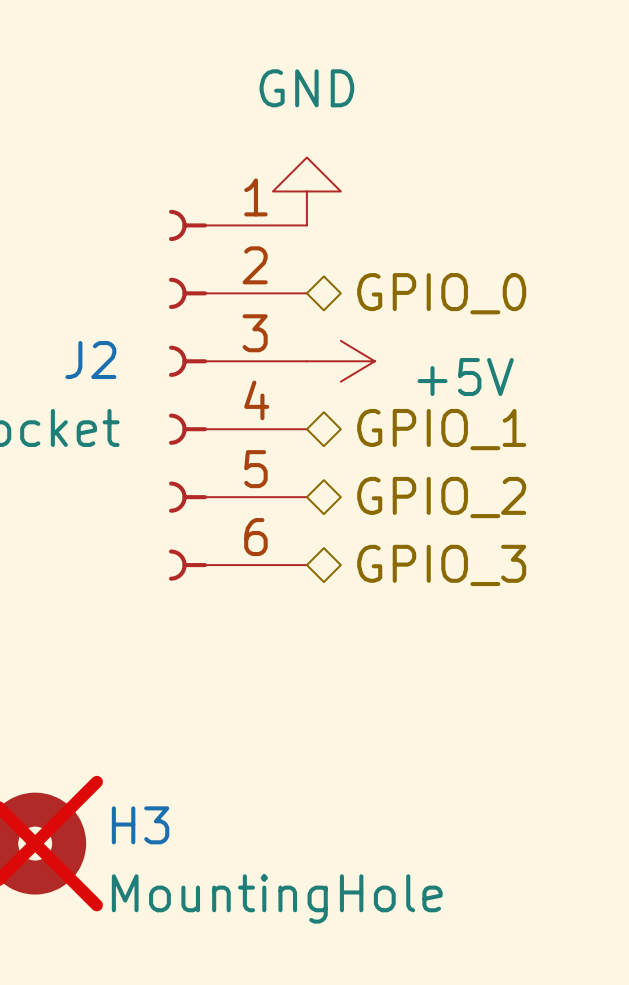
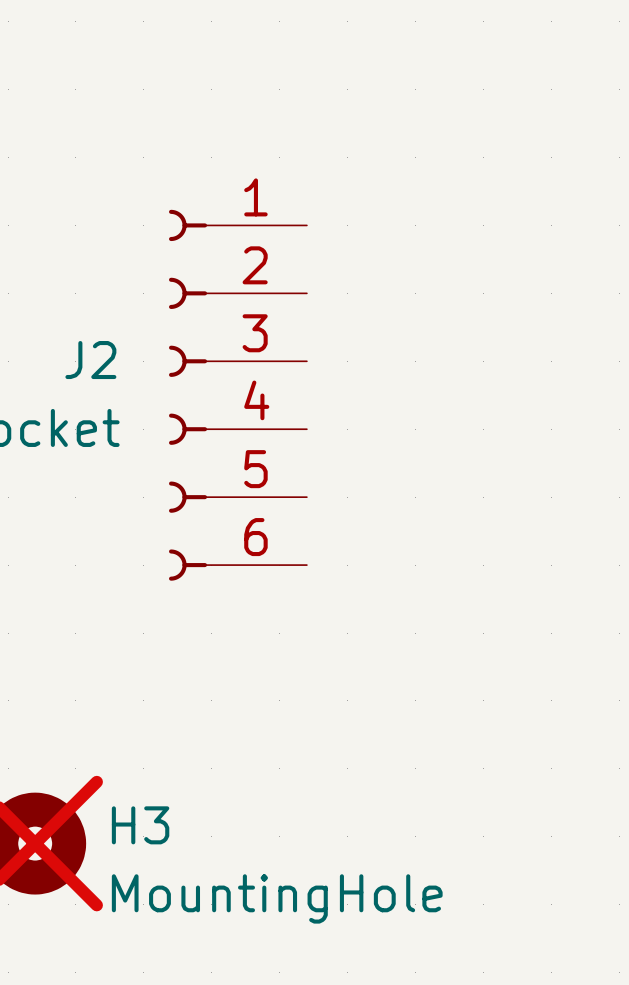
power symbol: GND (306, 191) -> none
hierarchical label: GPIO_0 (441, 293) -> none
power symbol: +5V (340, 361) -> none
hierarchical label: GPIO_1 (441, 429) -> none
hierarchical label: GPIO_2 (441, 497) -> none
hierarchical label: GPIO_3 (441, 565) -> none

